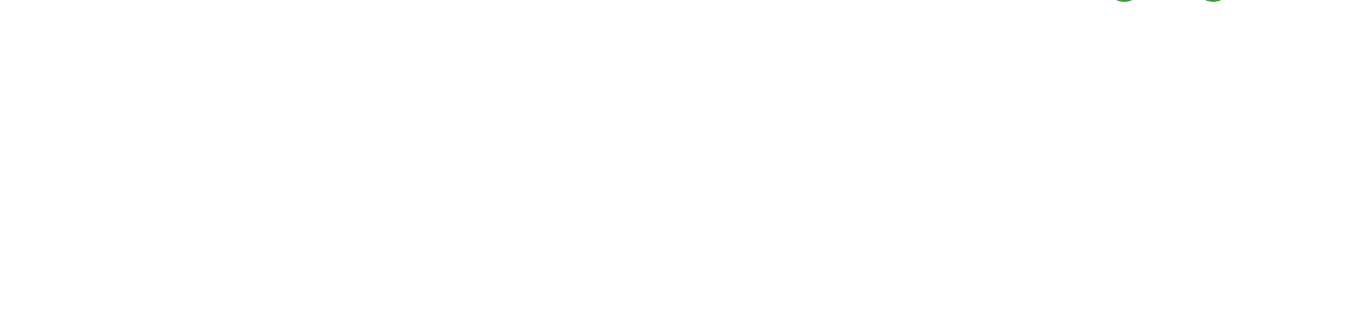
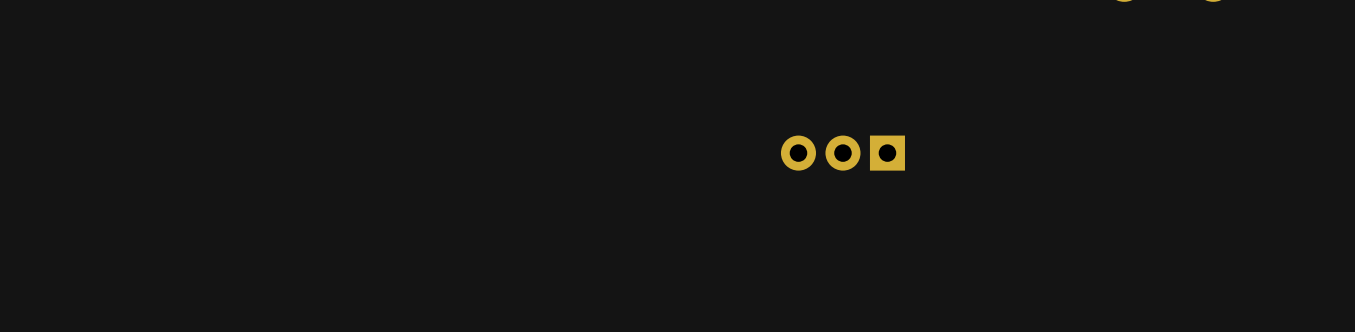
part: none -> (842, 153)

